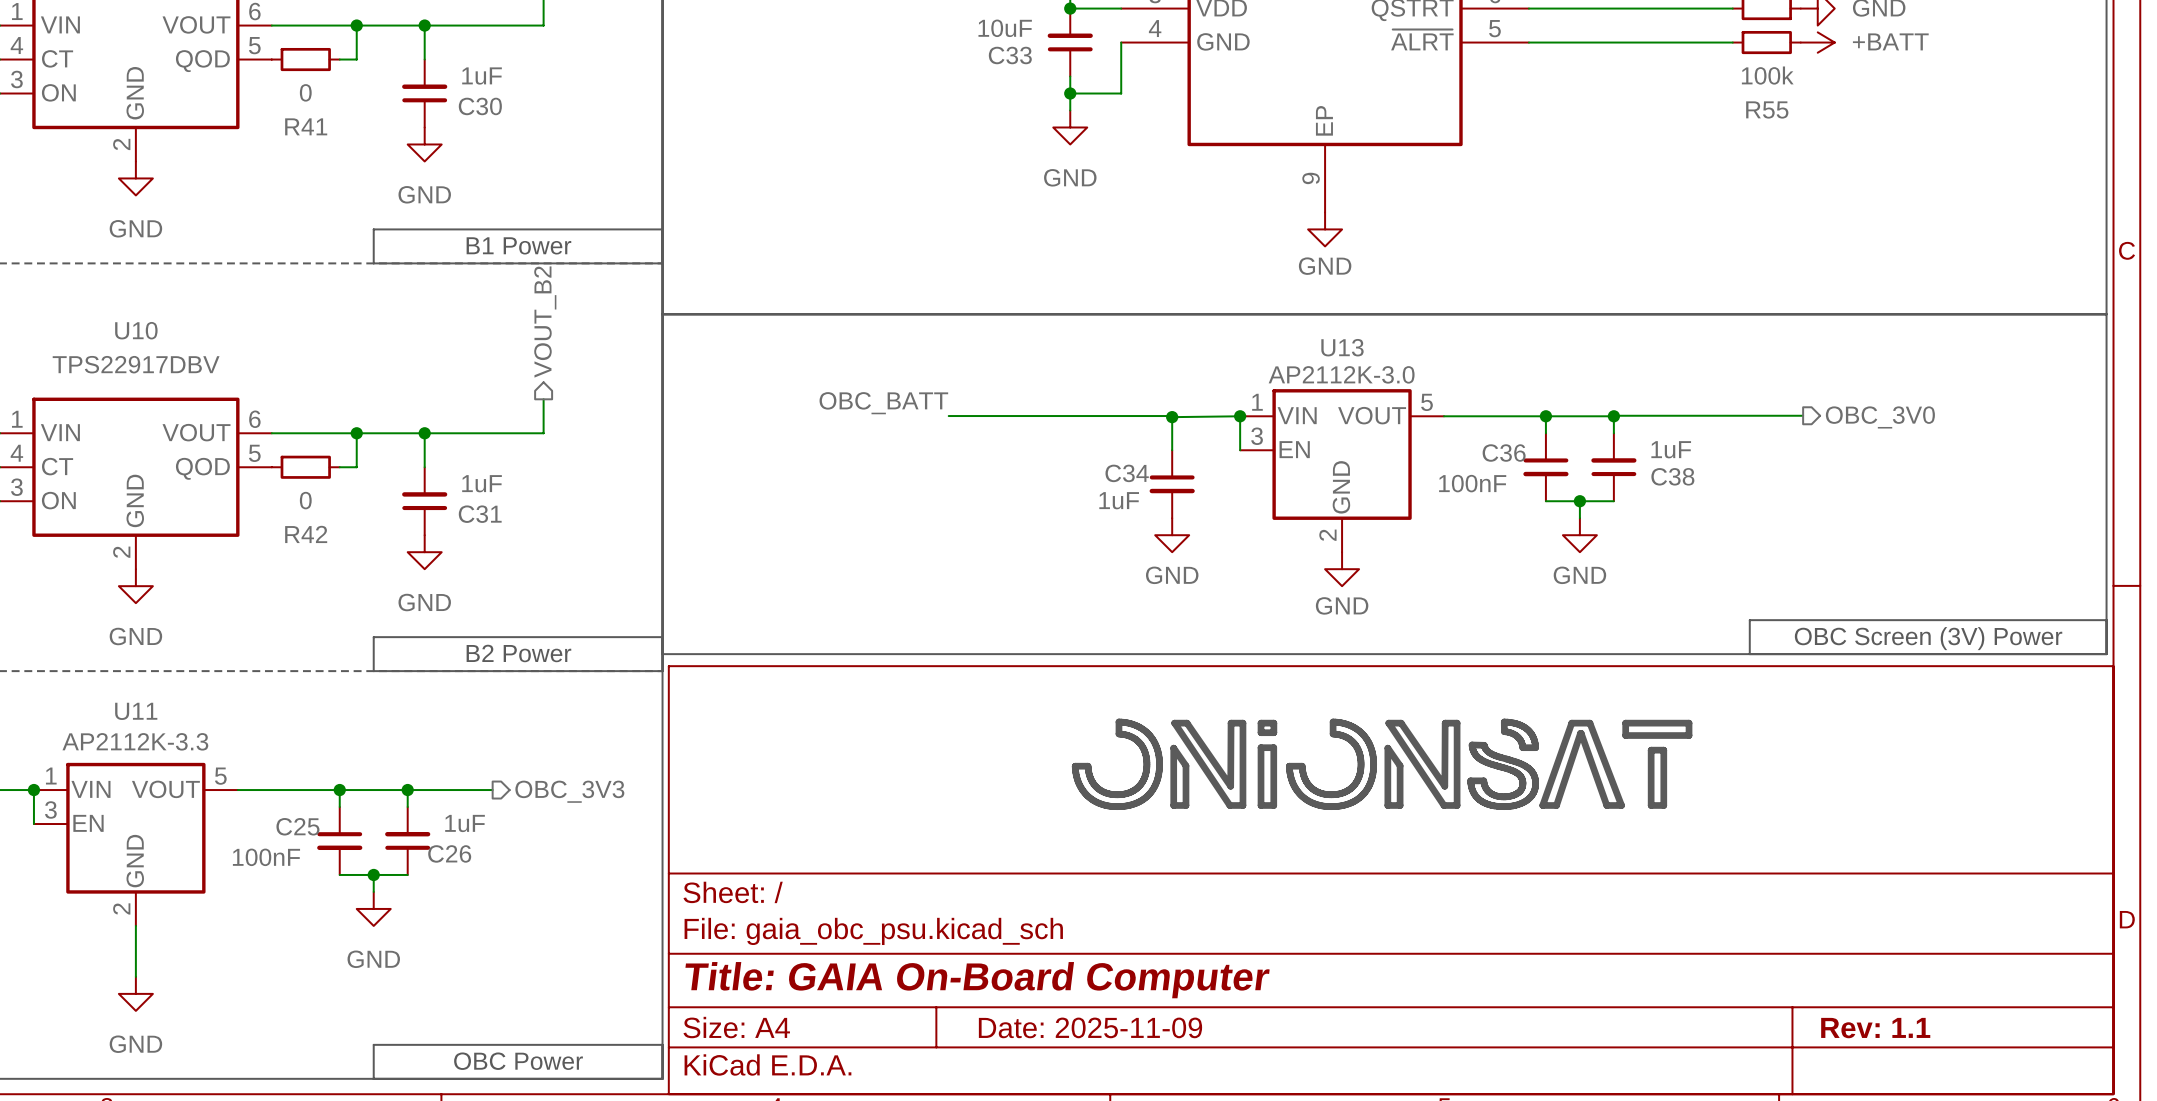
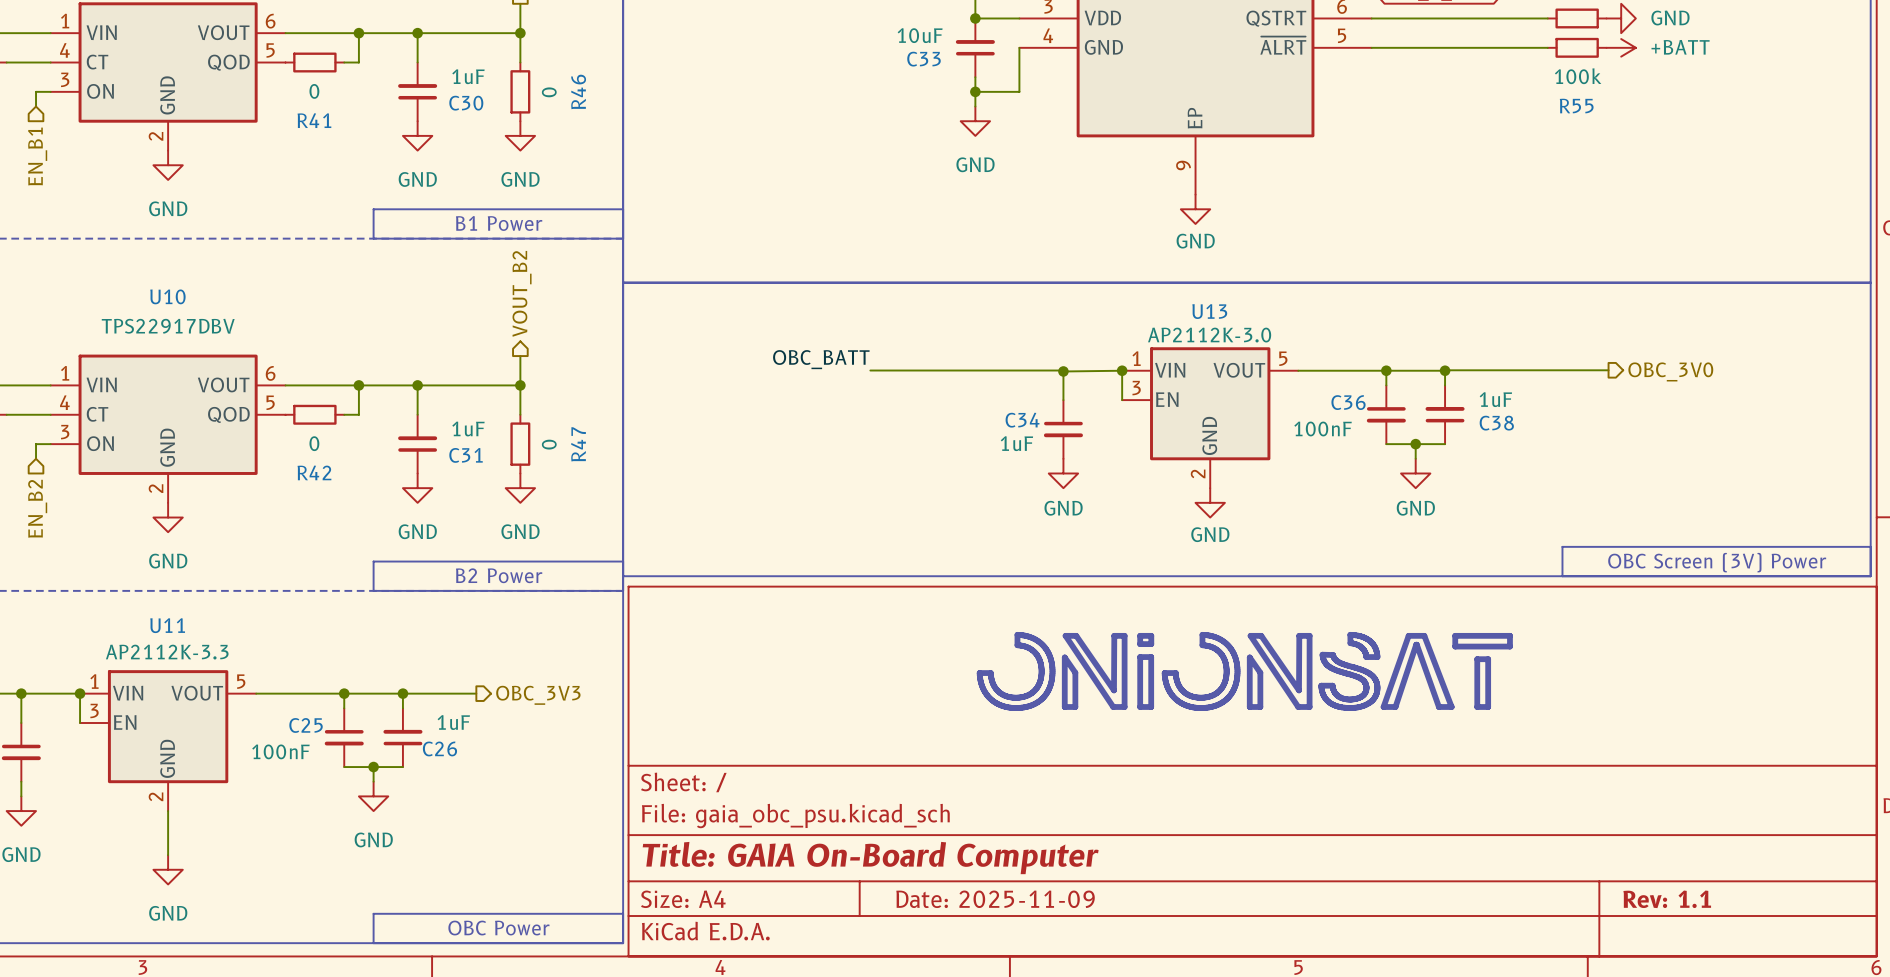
wire: none -> (520, 33) (520, 62)
junction: none -> (520, 33)
R46: none -> 0 (520, 91)
power symbol: none -> GND (520, 135)
wire: none -> (520, 385) (520, 414)
junction: none -> (520, 385)
R47: none -> 0 (520, 444)
power symbol: none -> GND (520, 488)

